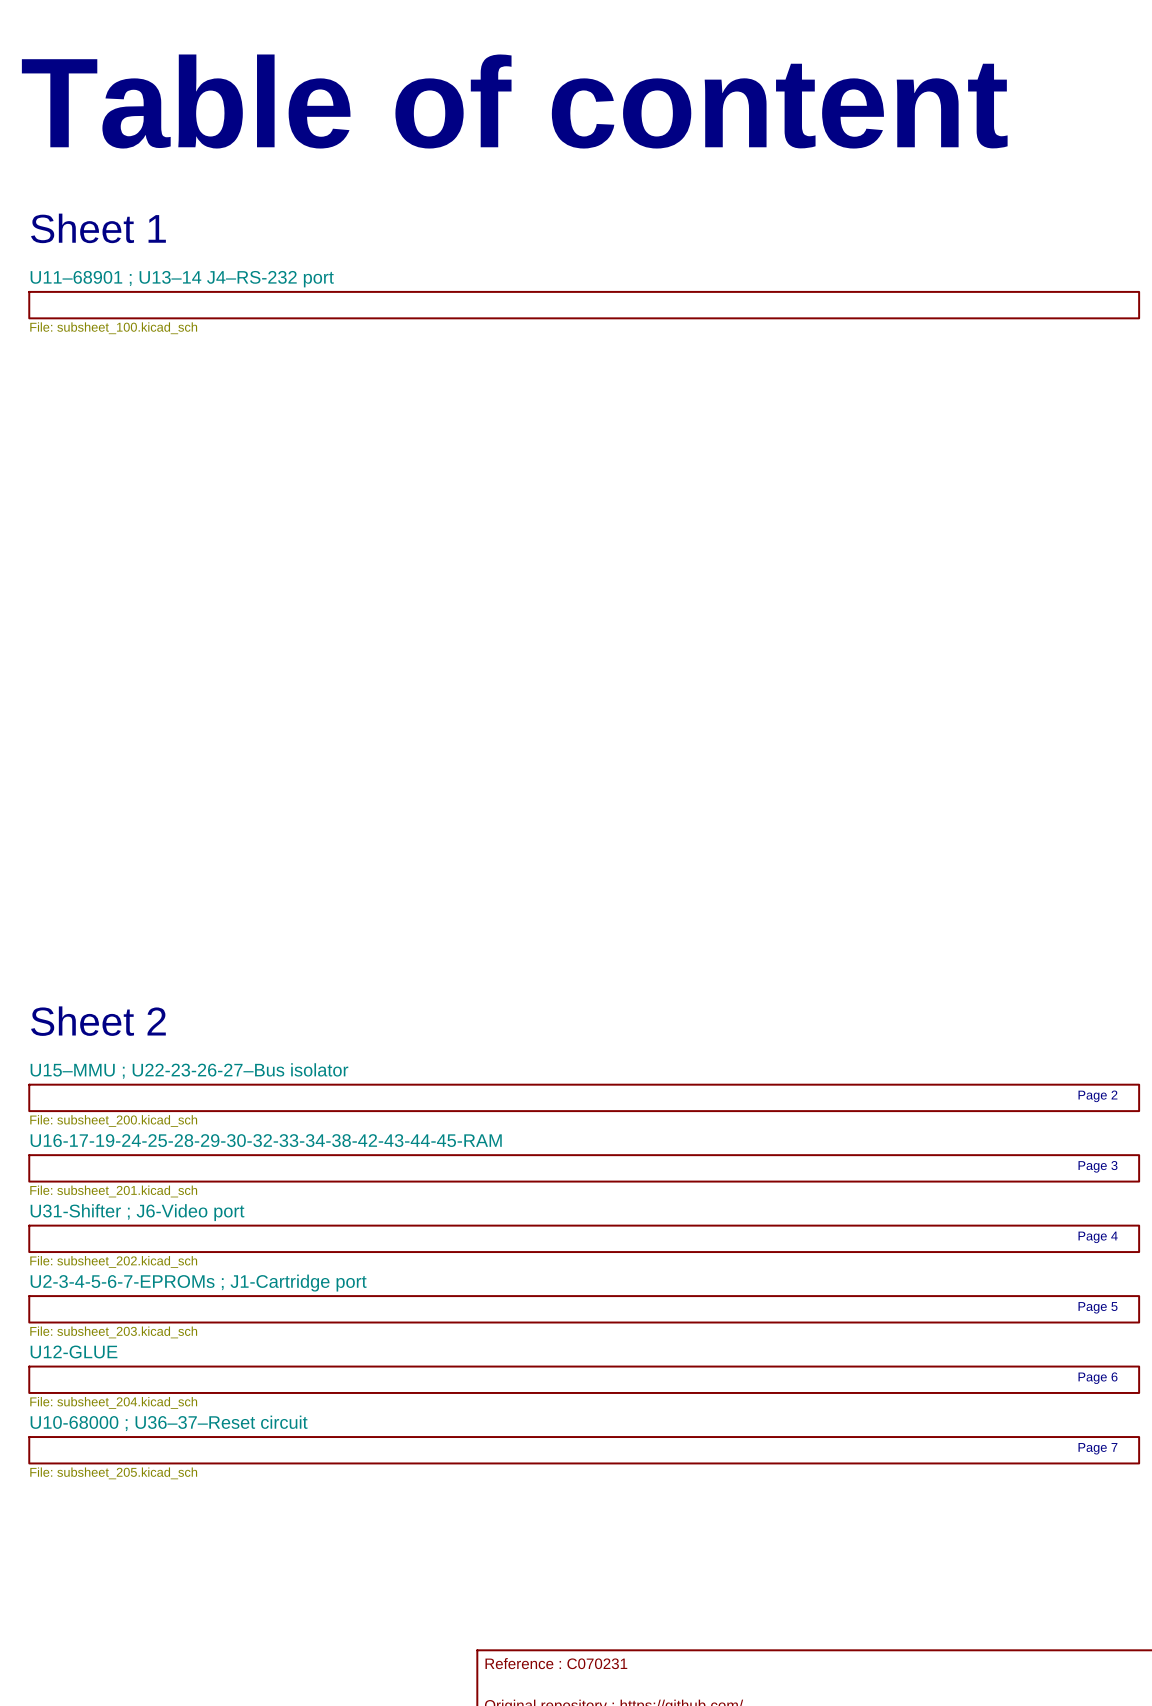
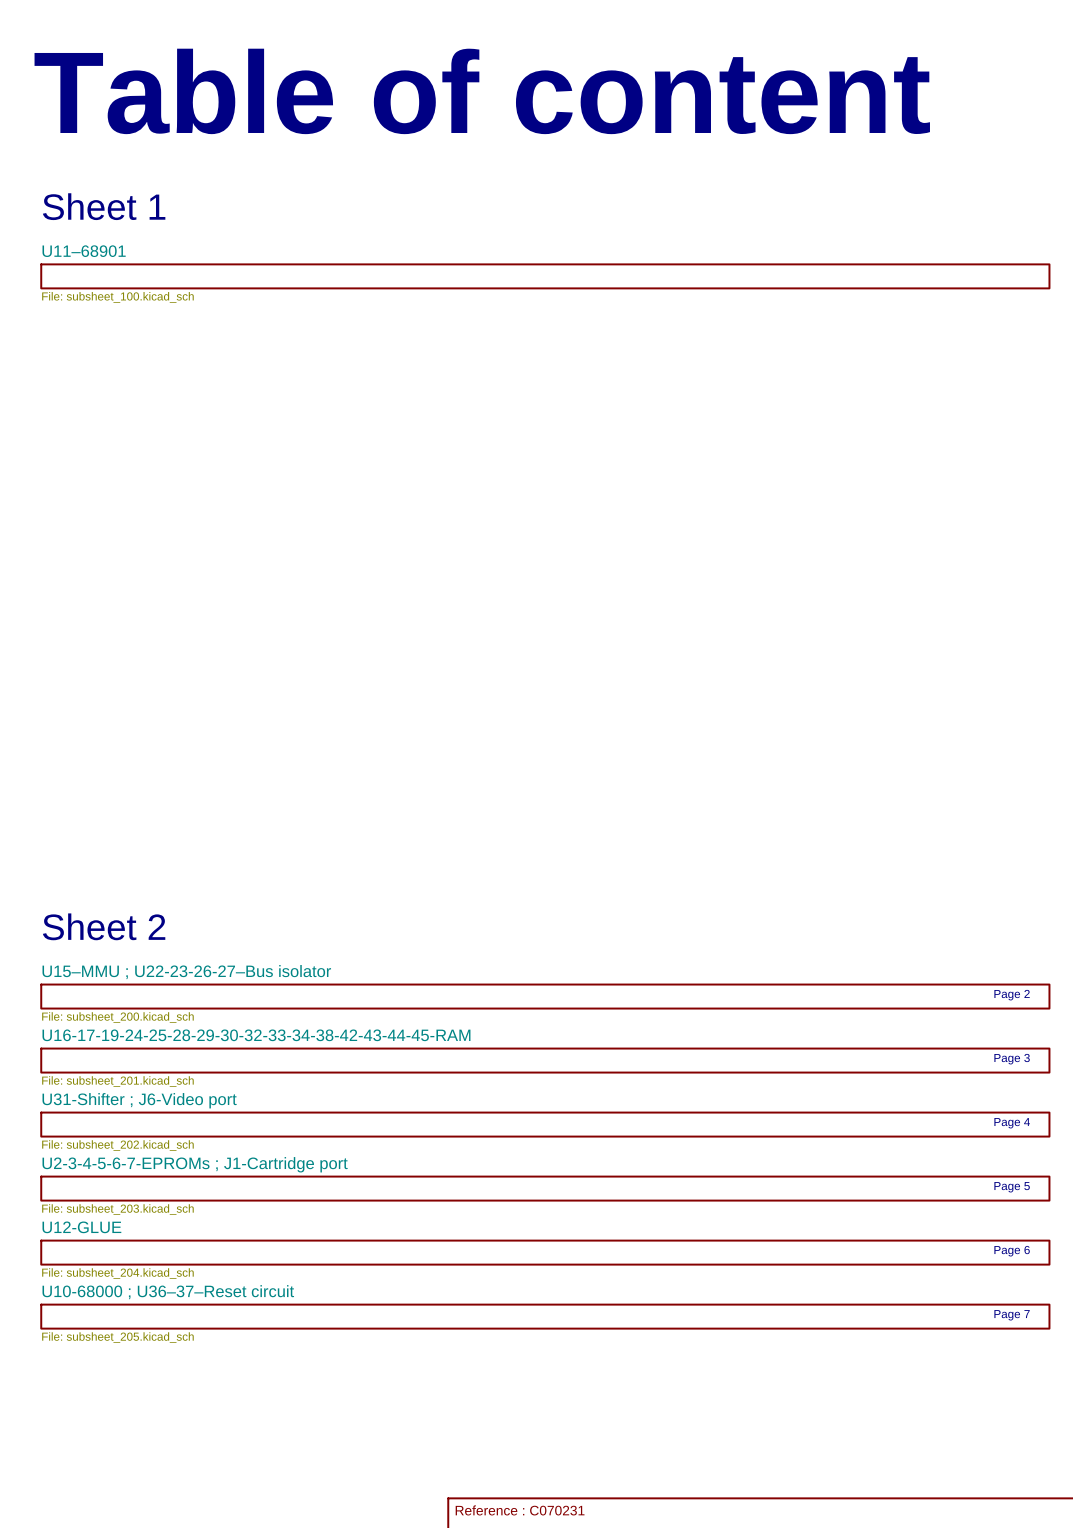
sheet U11–68901 name: U11–68901 ; U13–14 J4–RS-232 port (182, 279) -> U11–68901 (84, 251)

